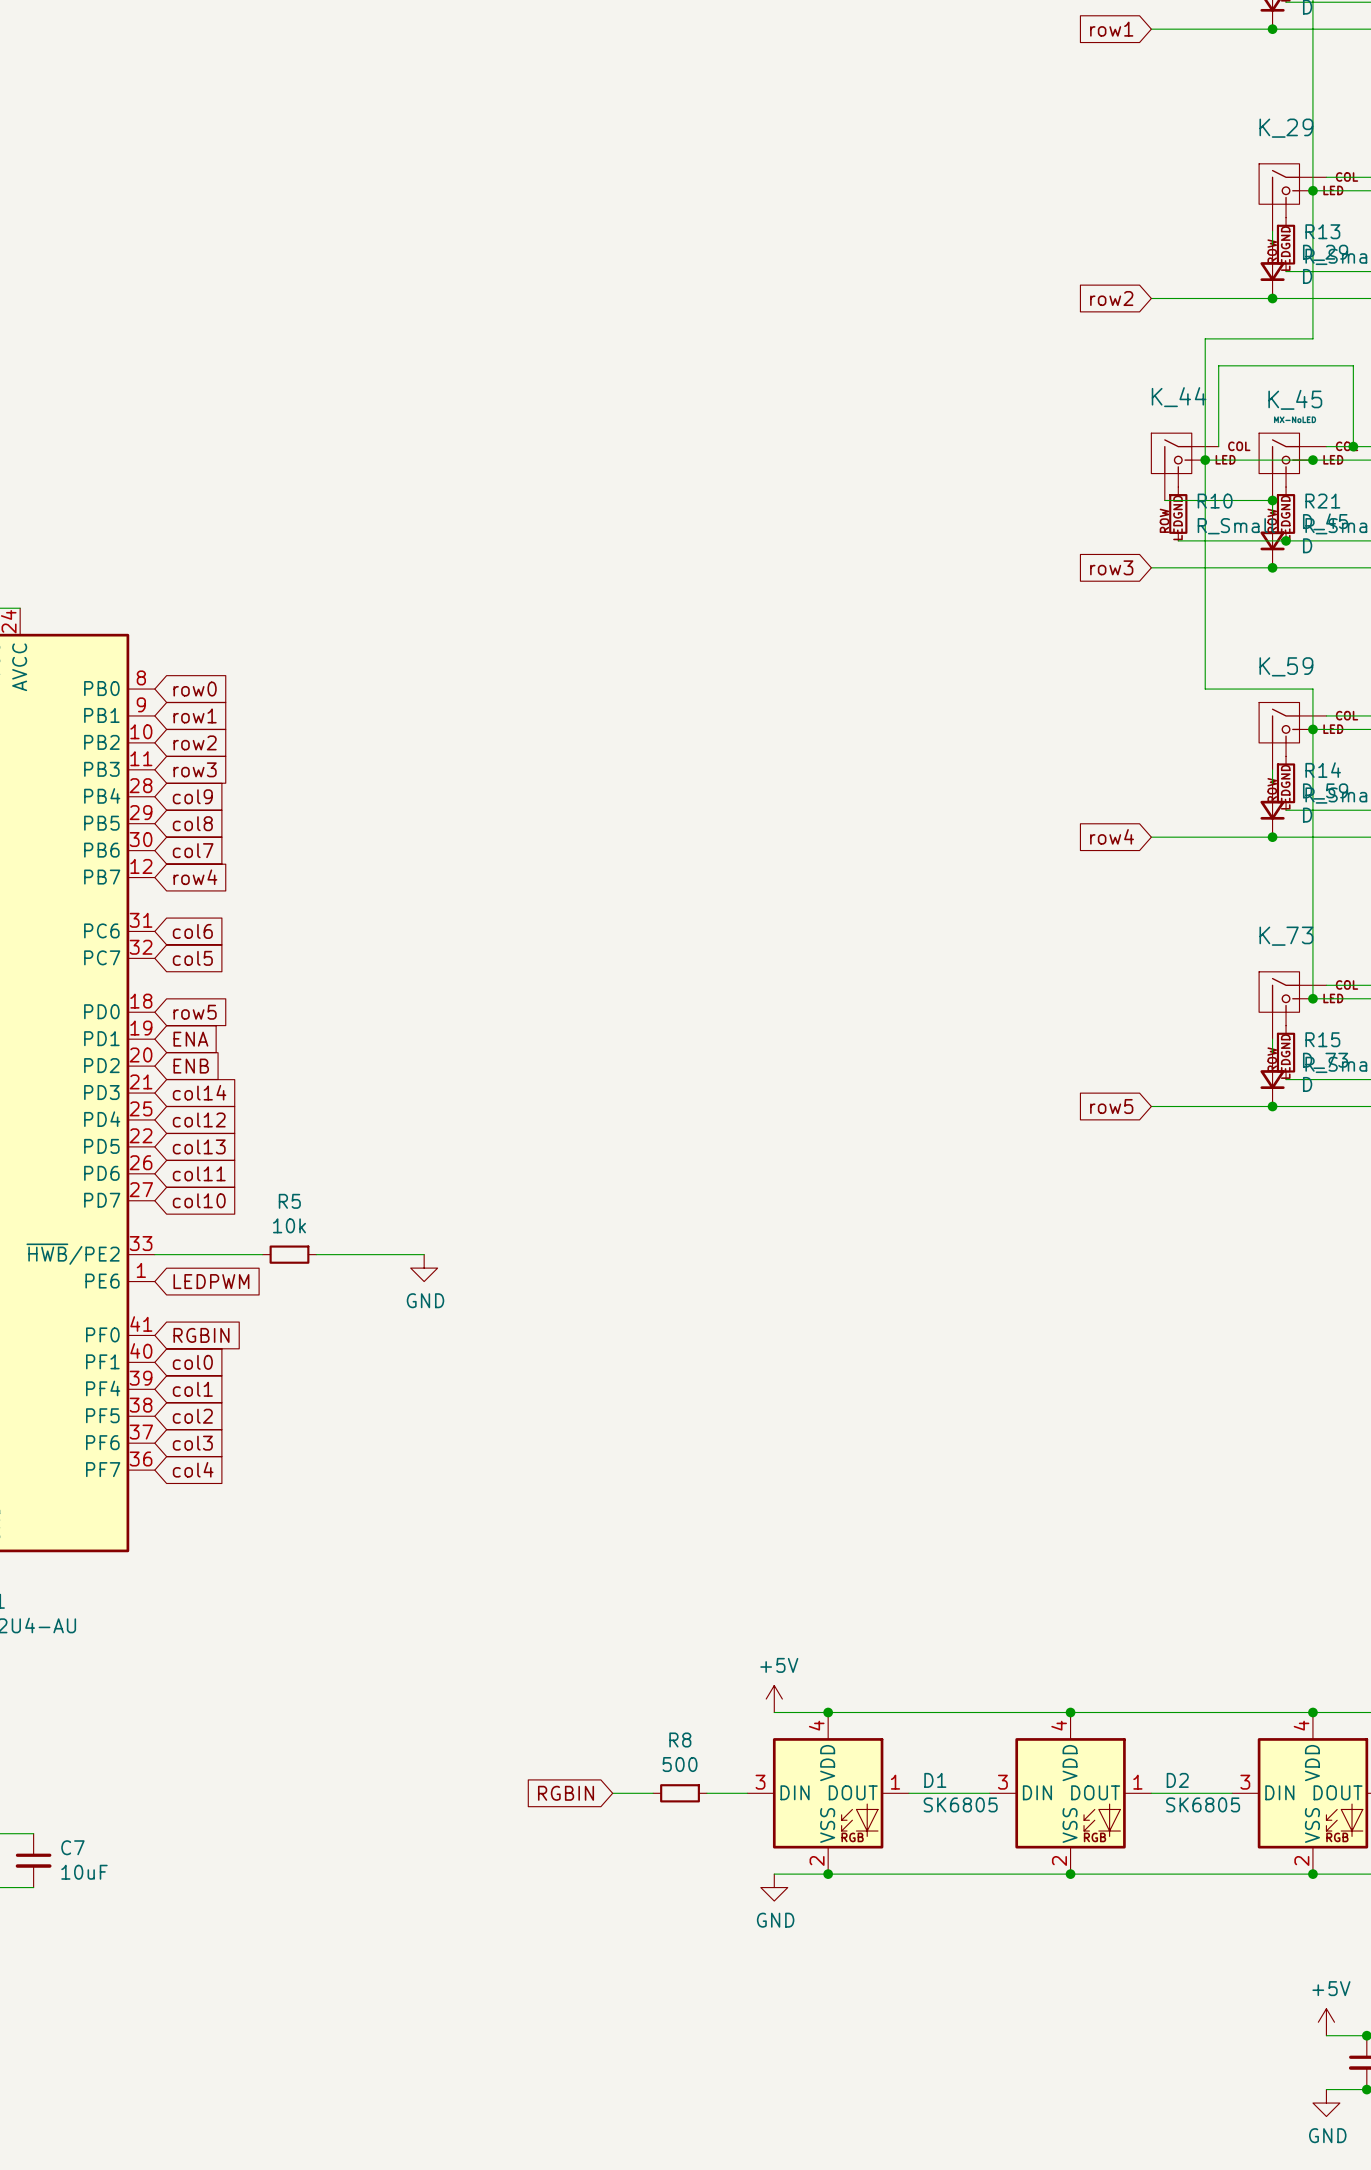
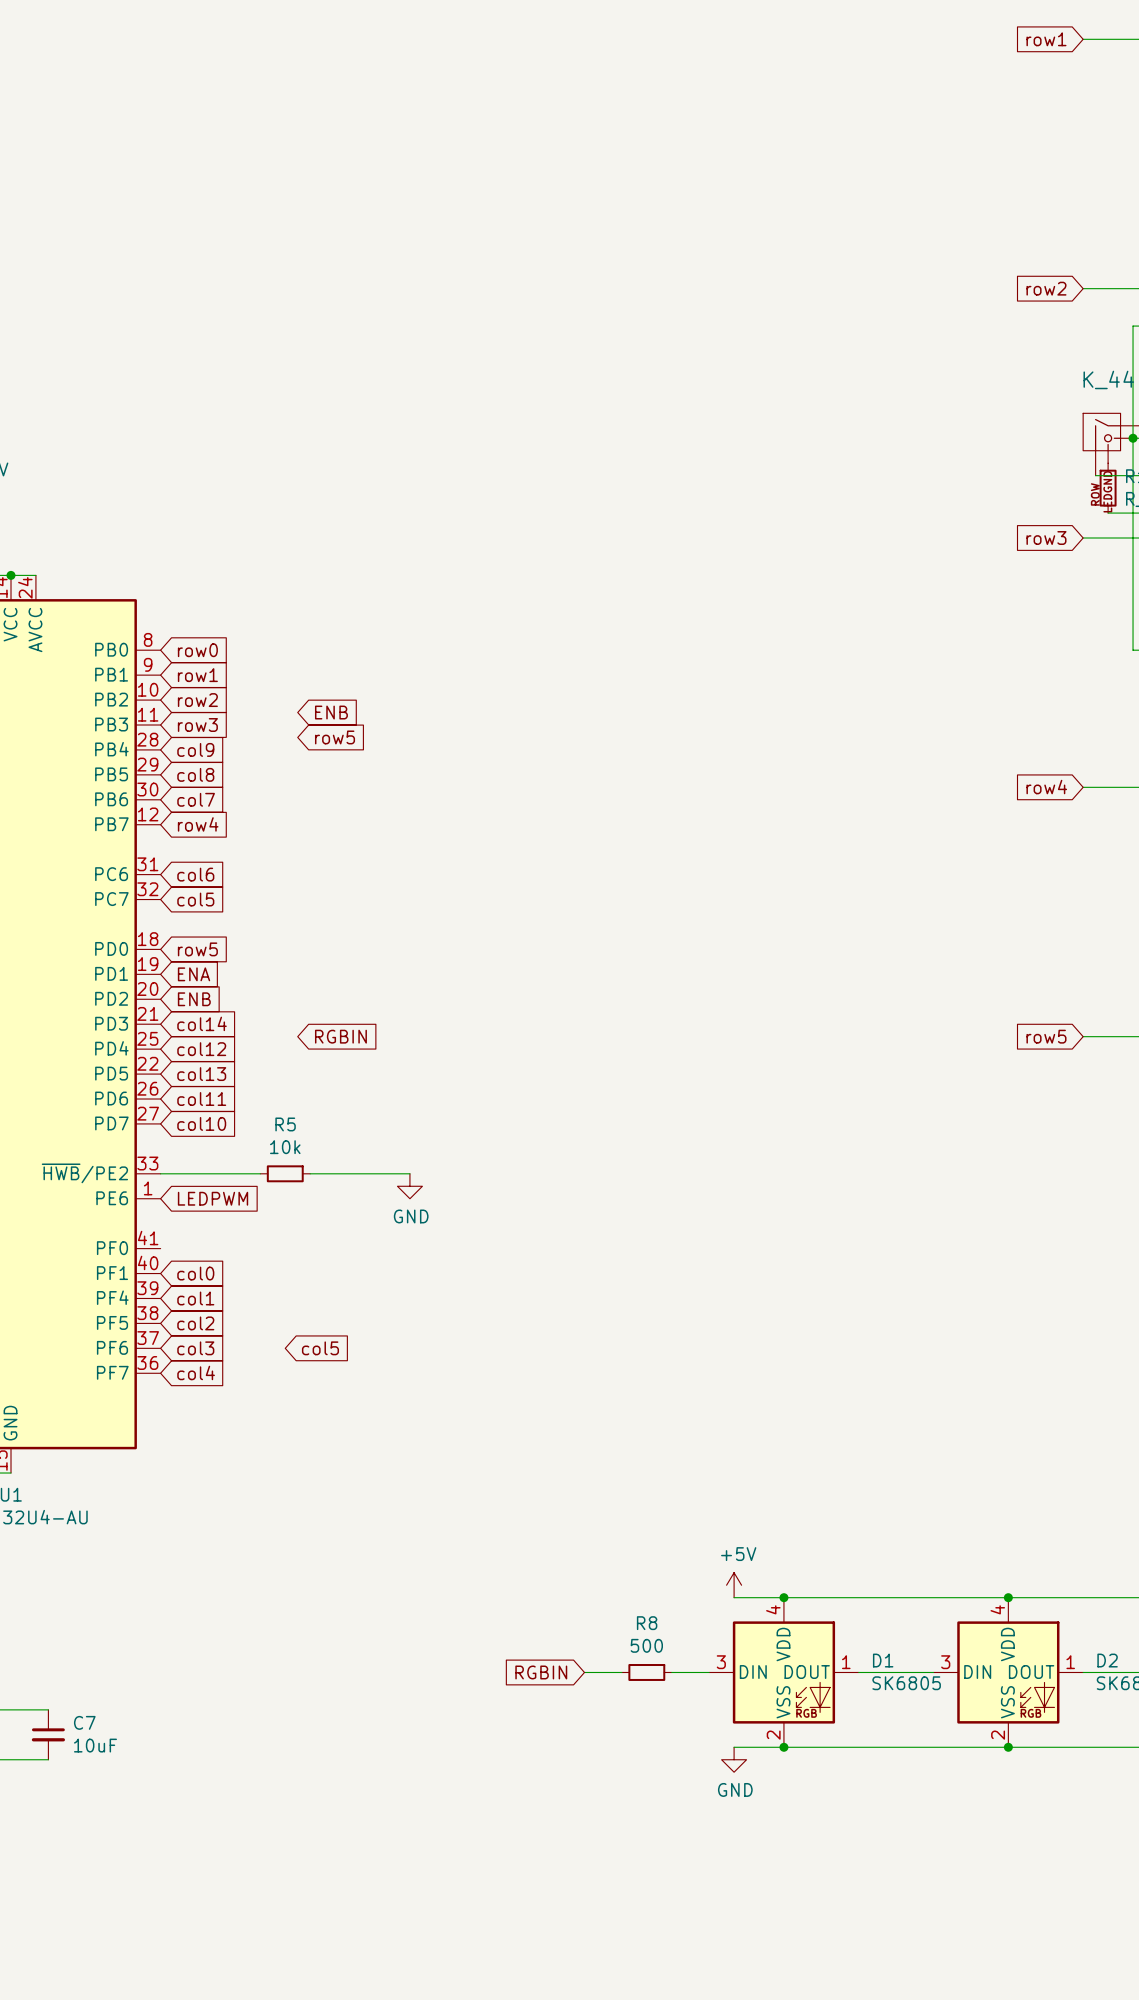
global label: none -> ENB (331, 712)
global label: none -> row5 (335, 737)
global label: none -> RGBIN (340, 1036)
global label: RGBIN (201, 1335) -> none
global label: none -> col5 (320, 1348)

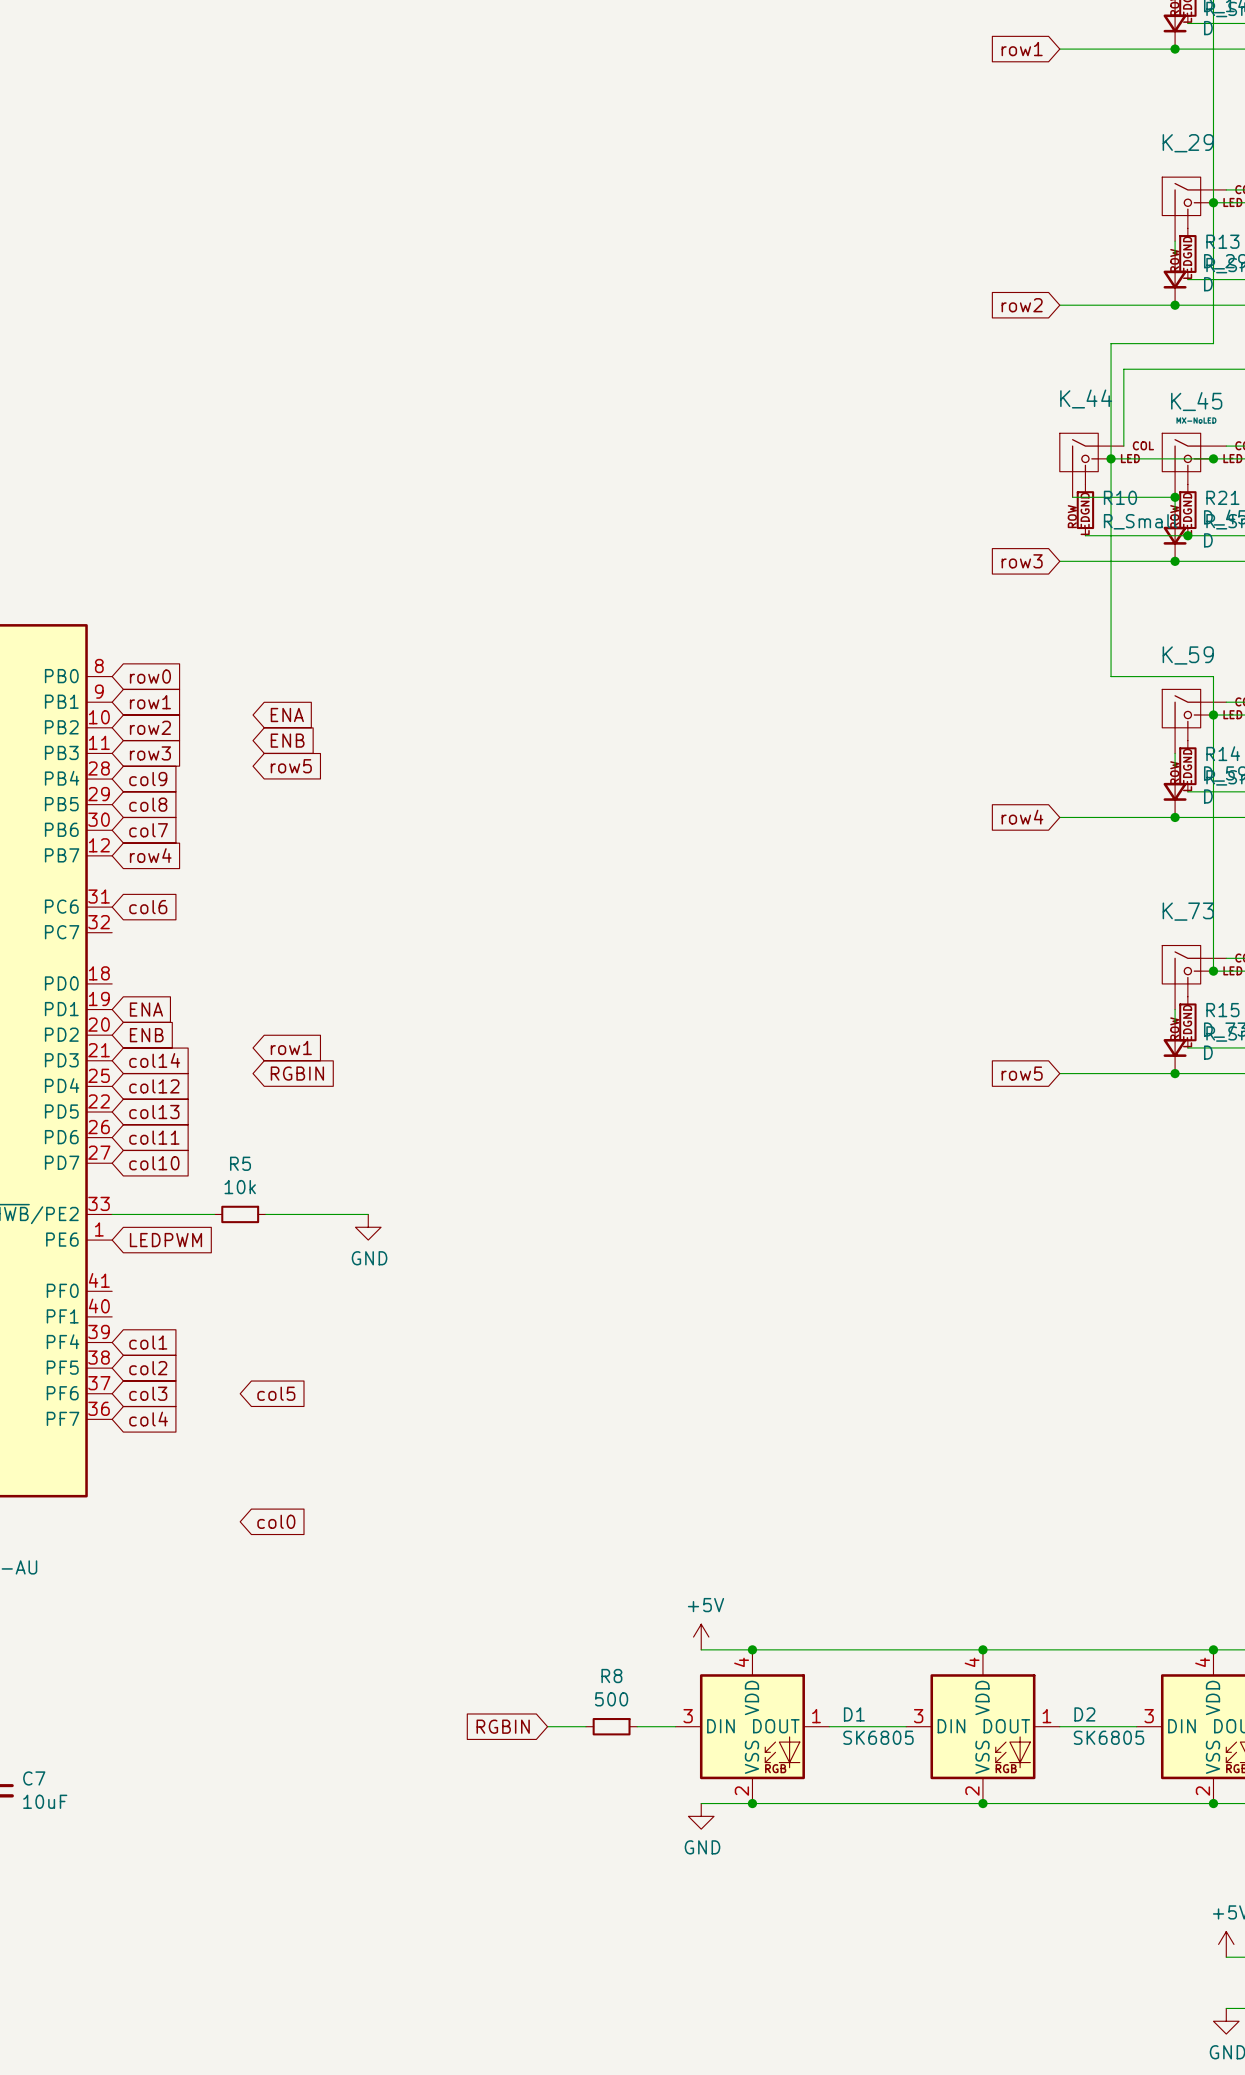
global label: none -> ENA (287, 715)
global label: col5 (195, 899) -> none
global label: row5 (197, 949) -> none
global label: none -> row1 (291, 1047)
global label position: col0 (195, 1273) -> col0 (276, 1521)

